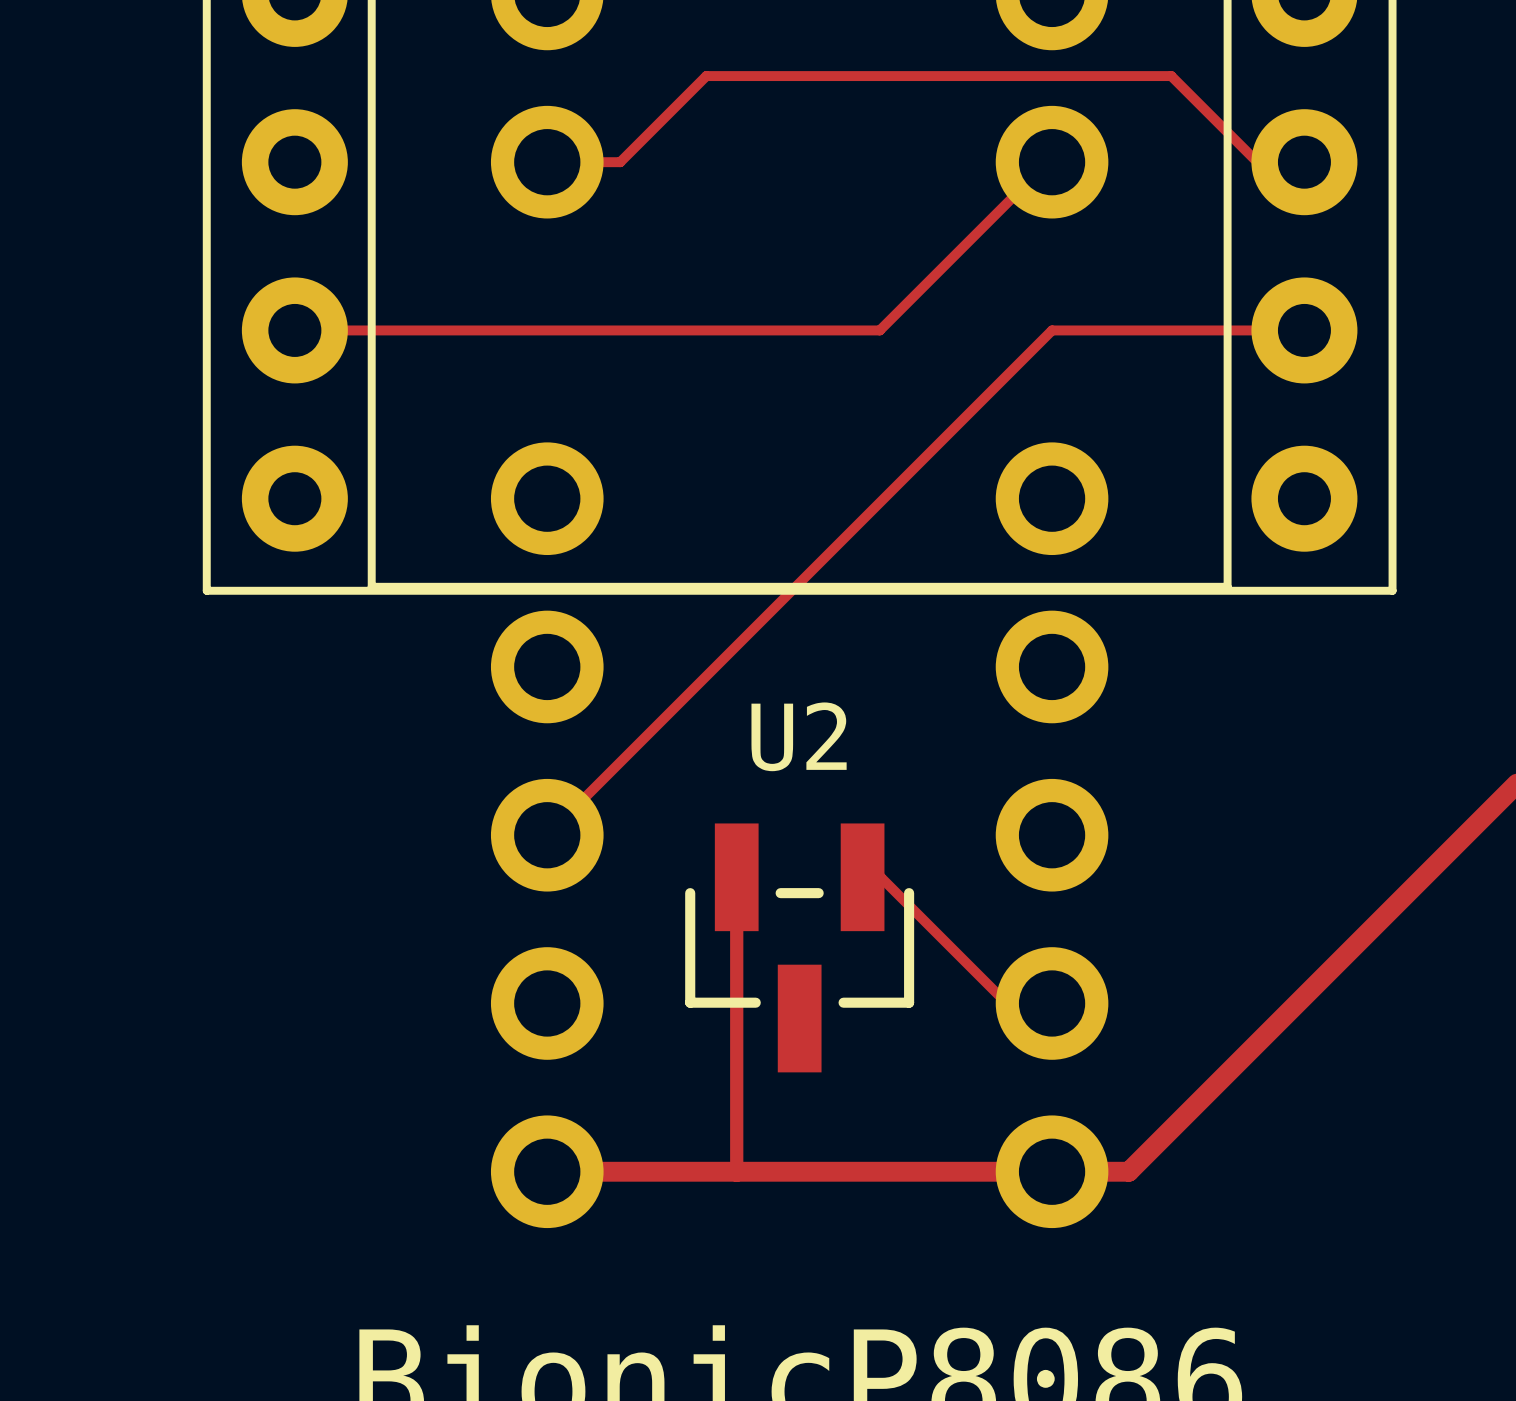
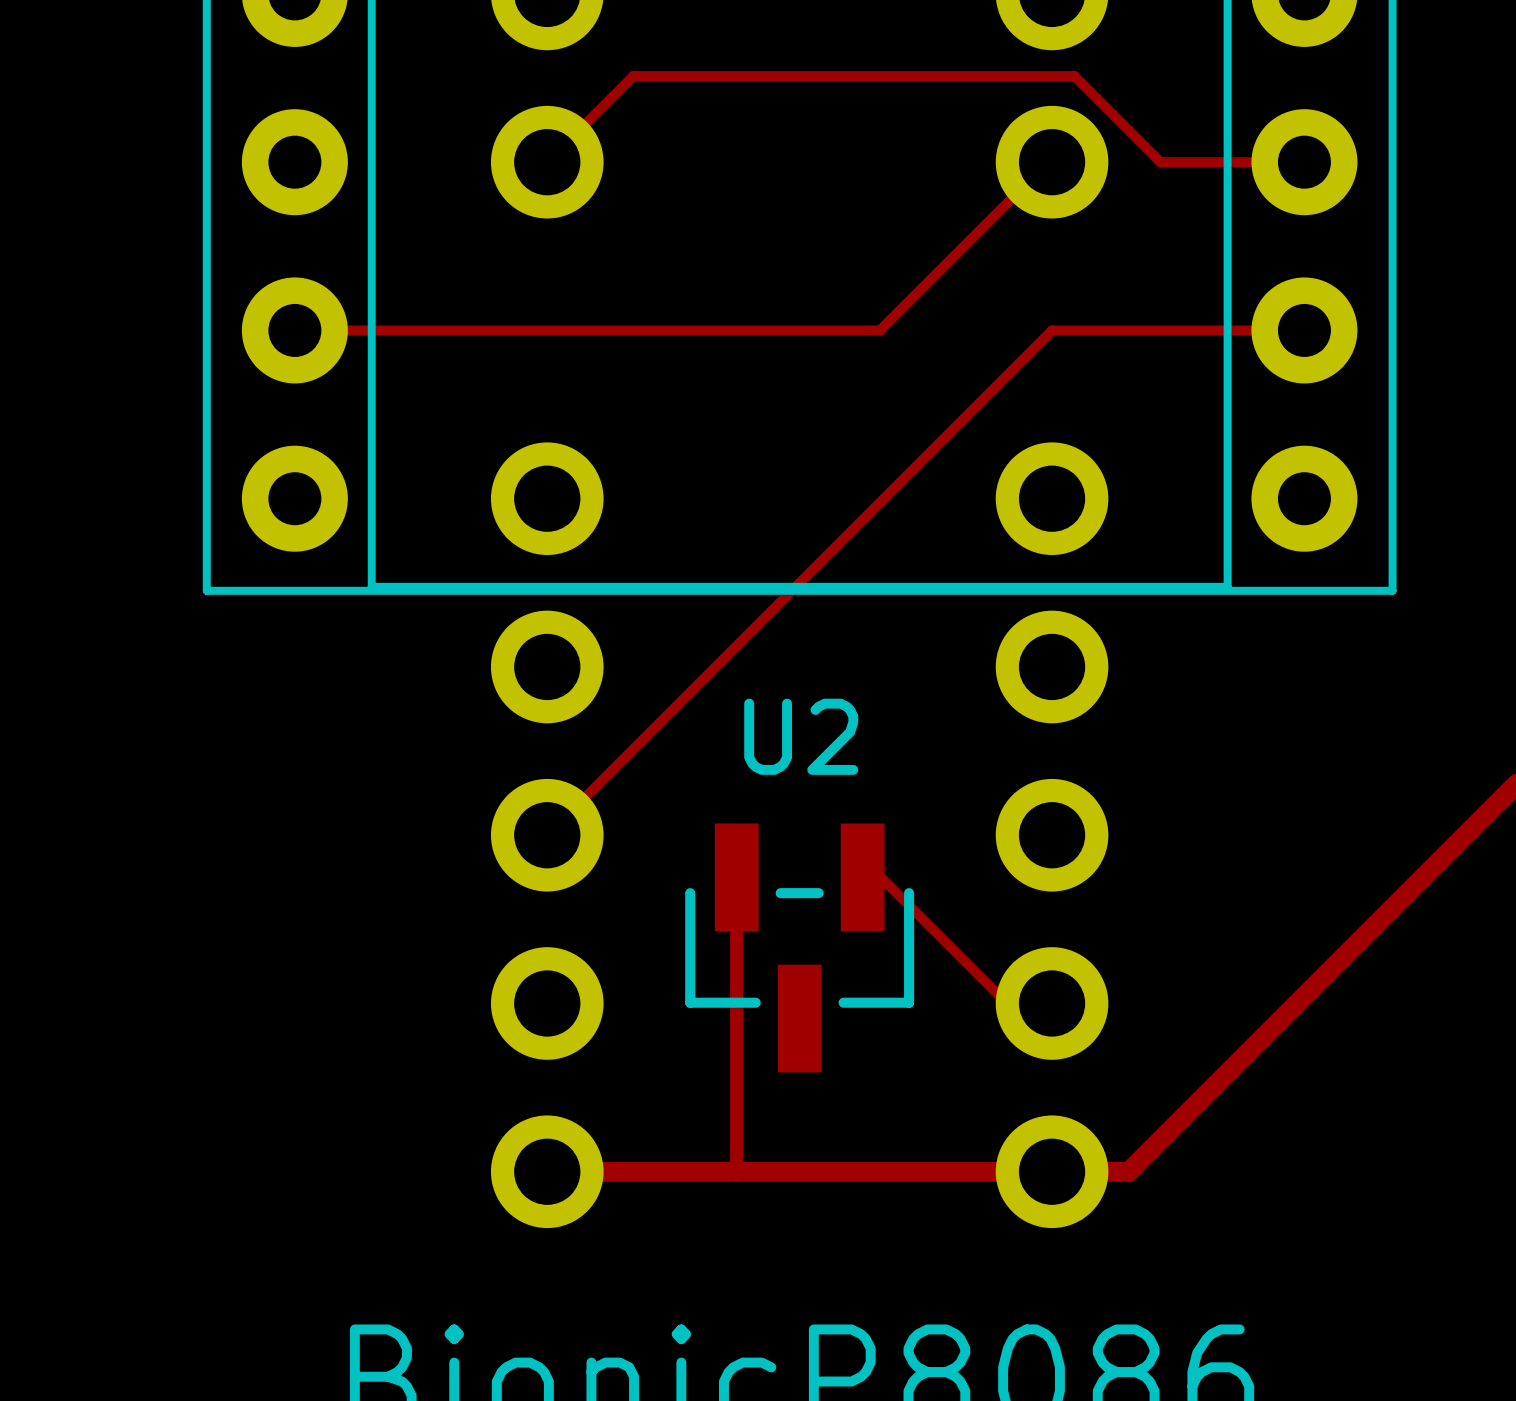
track: (706, 76) (620, 162) (547, 162) -> (706, 76) (633, 76) (547, 162)
track: (1074, 76) (1171, 76) (1257, 162) -> (1074, 76) (1160, 162) (1257, 162)

